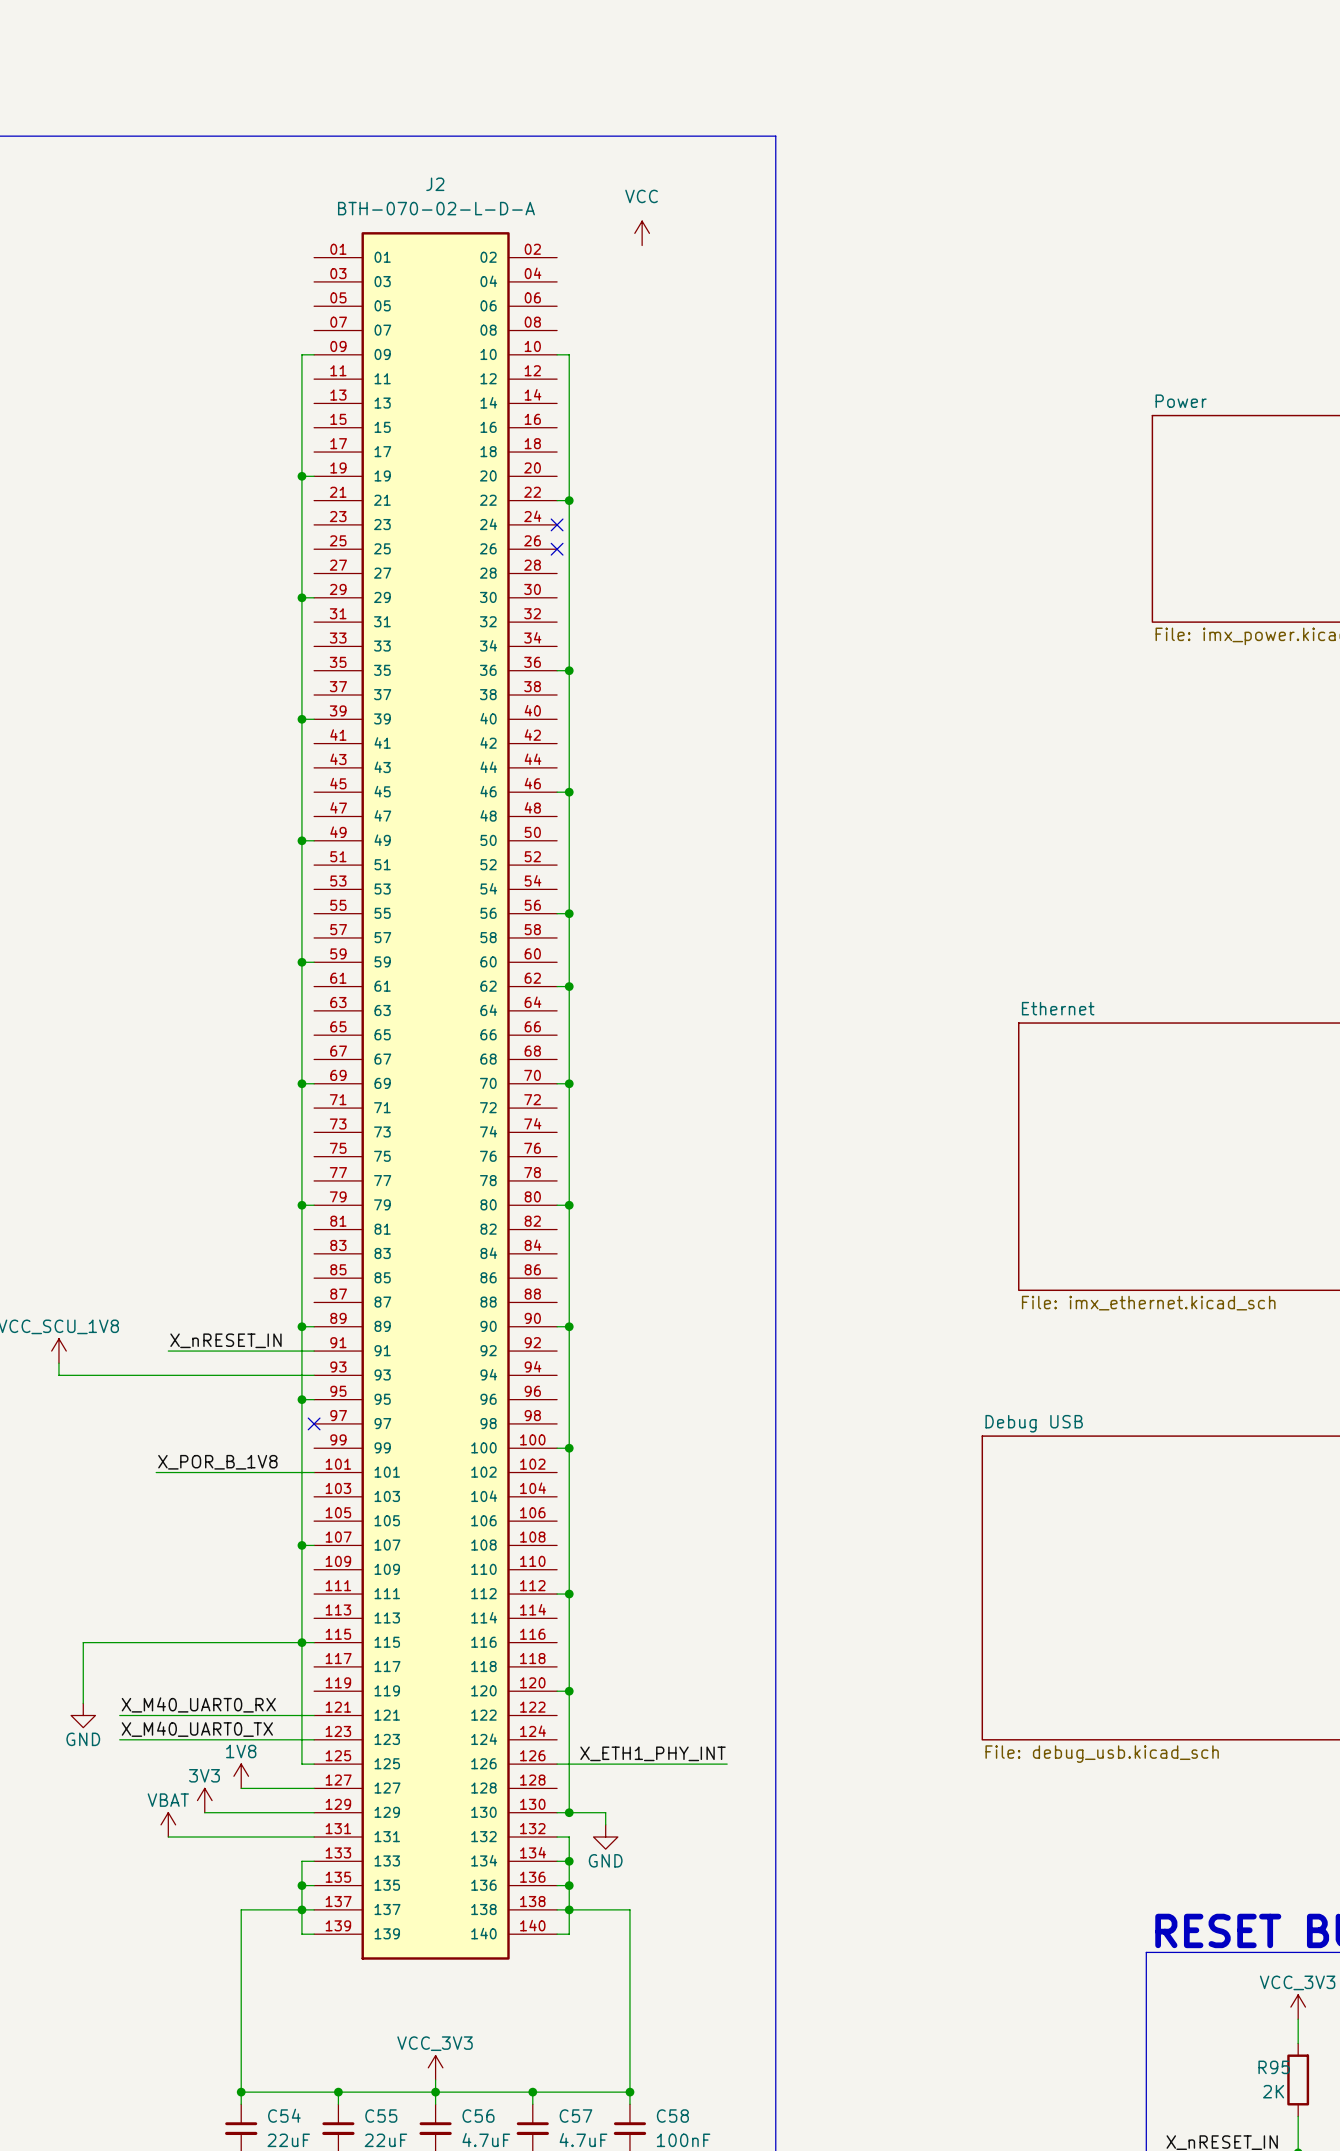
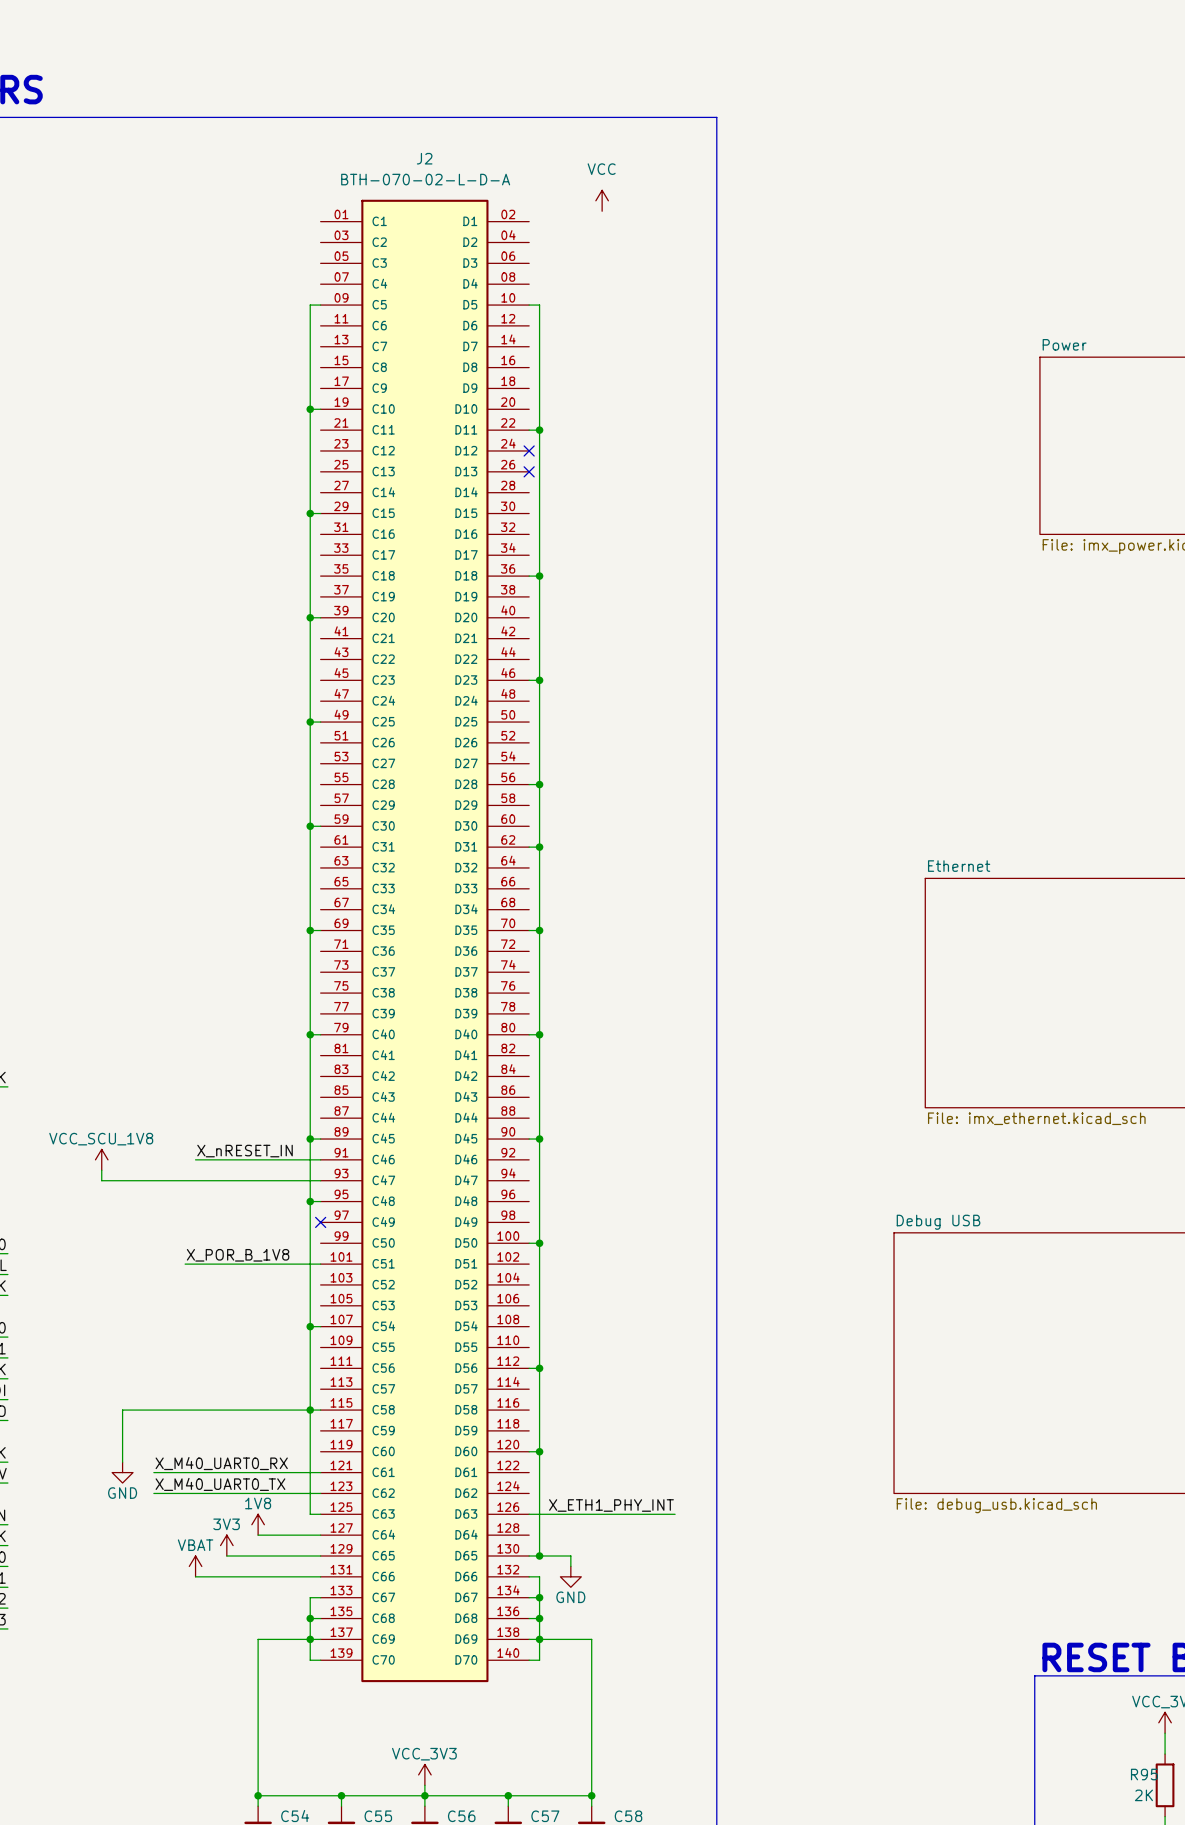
J2 symbol: [314, 232, 558, 1960] -> [320, 199, 530, 1683]

